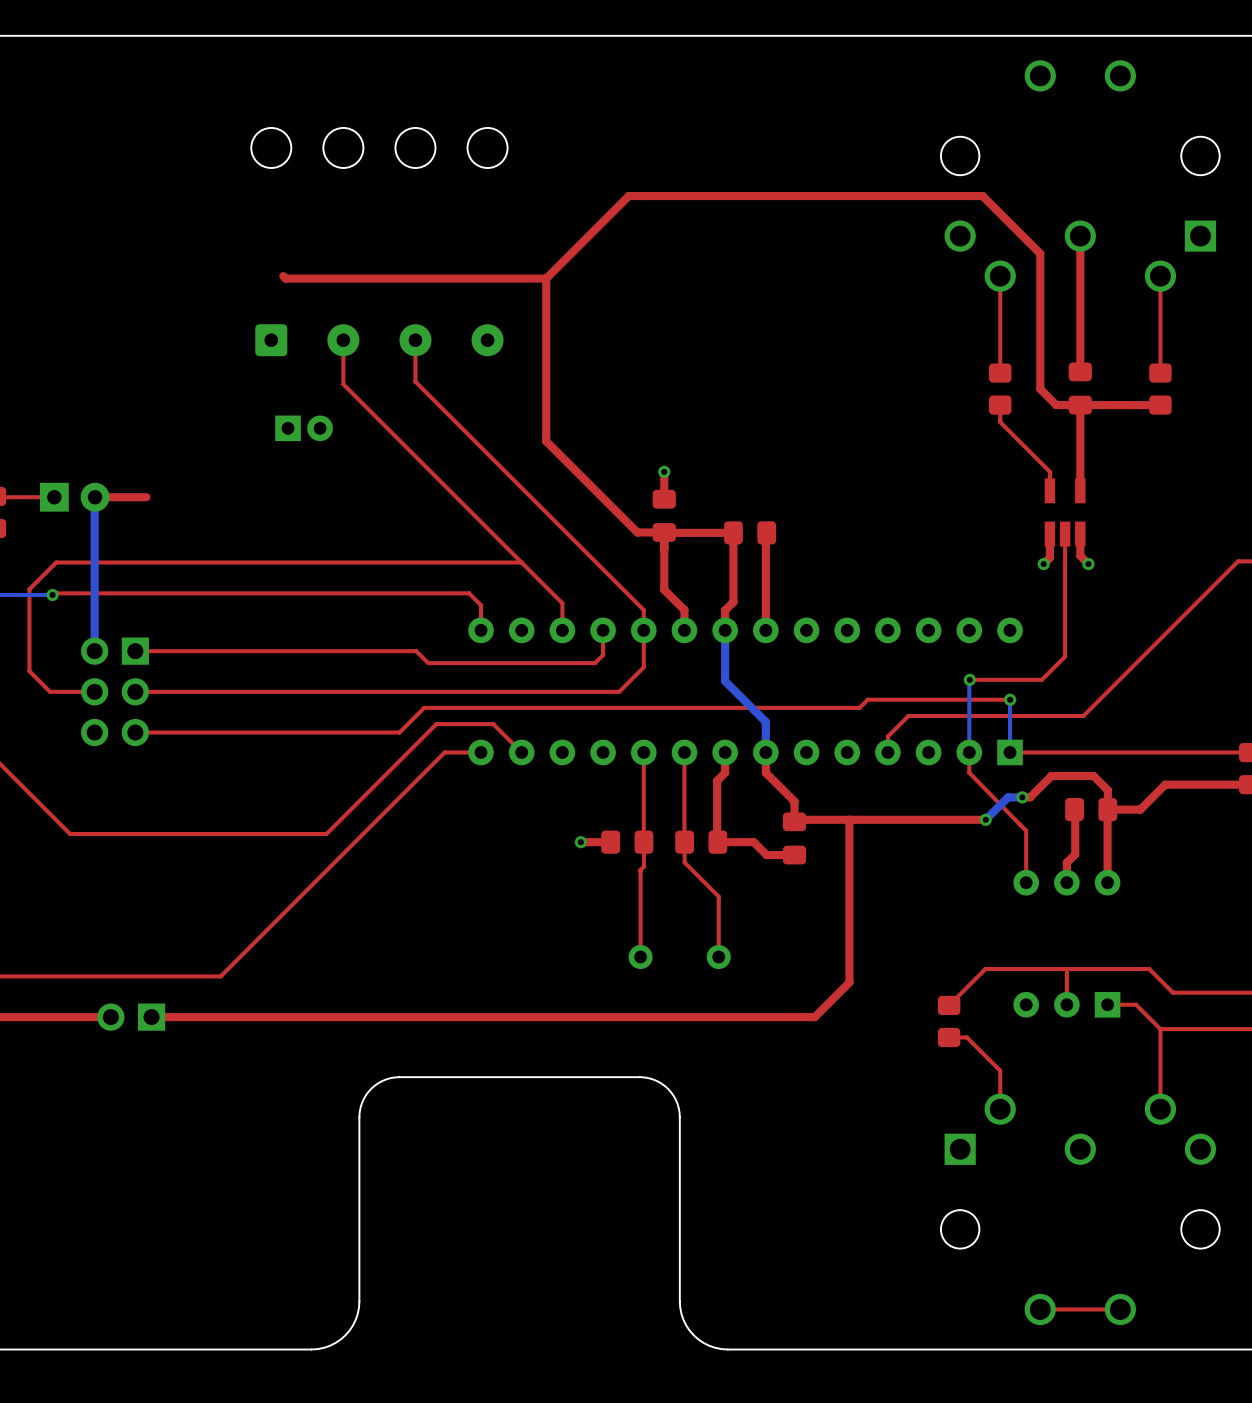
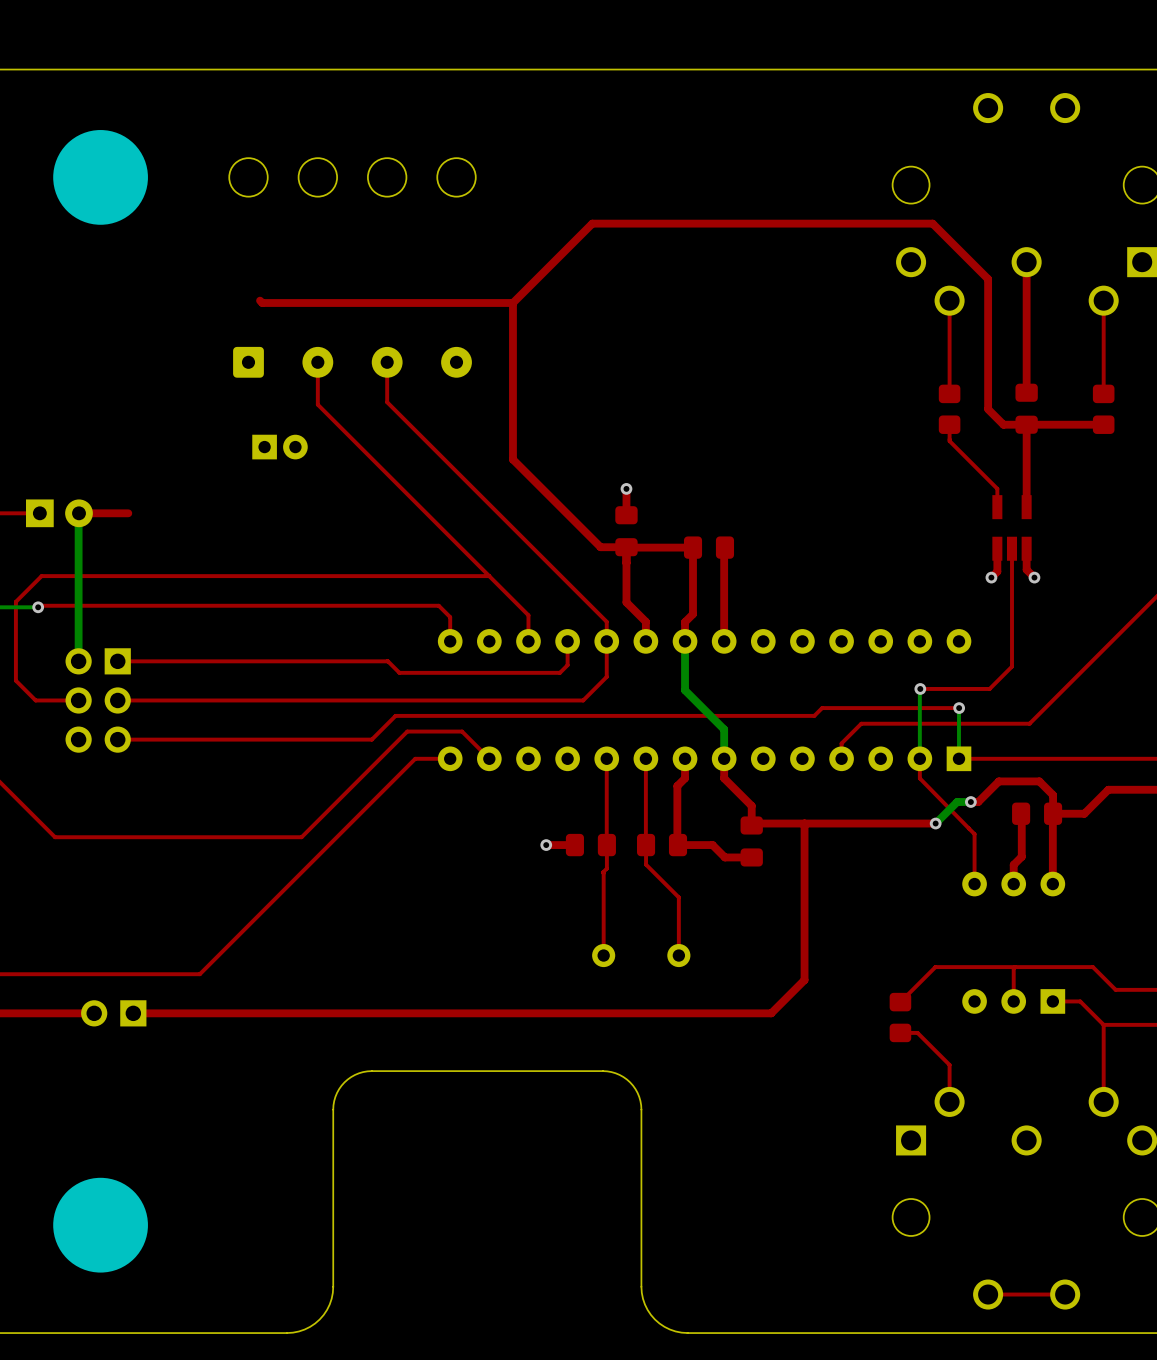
drawing: none -> [53, 130, 148, 225]
drawing: none -> [53, 1177, 148, 1273]

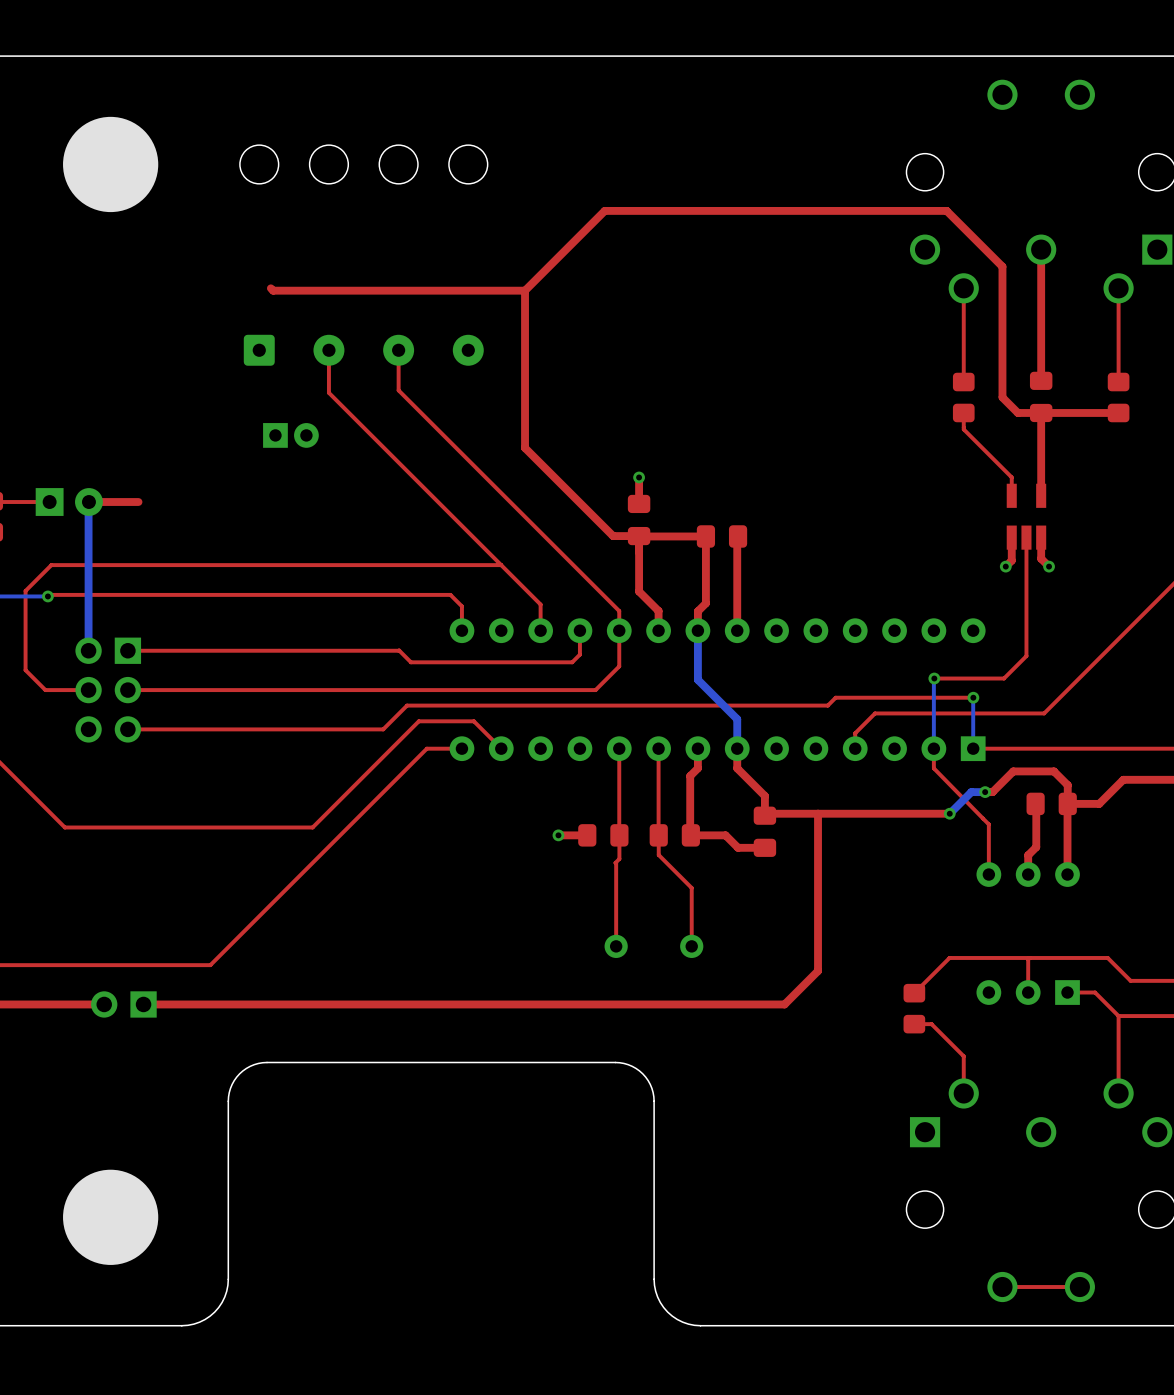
board edge: (371, 1071) (359, 1073) (347, 1079) (339, 1089) (334, 1101) (333, 1286) (331, 1298) (323, 1314) (310, 1326) (293, 1332) (171, 1333) -> (383, 1062) (262, 1062) (246, 1068) (236, 1077) (230, 1088) (228, 1101) (226, 1291) (218, 1307) (210, 1316) (199, 1322) (181, 1325)

